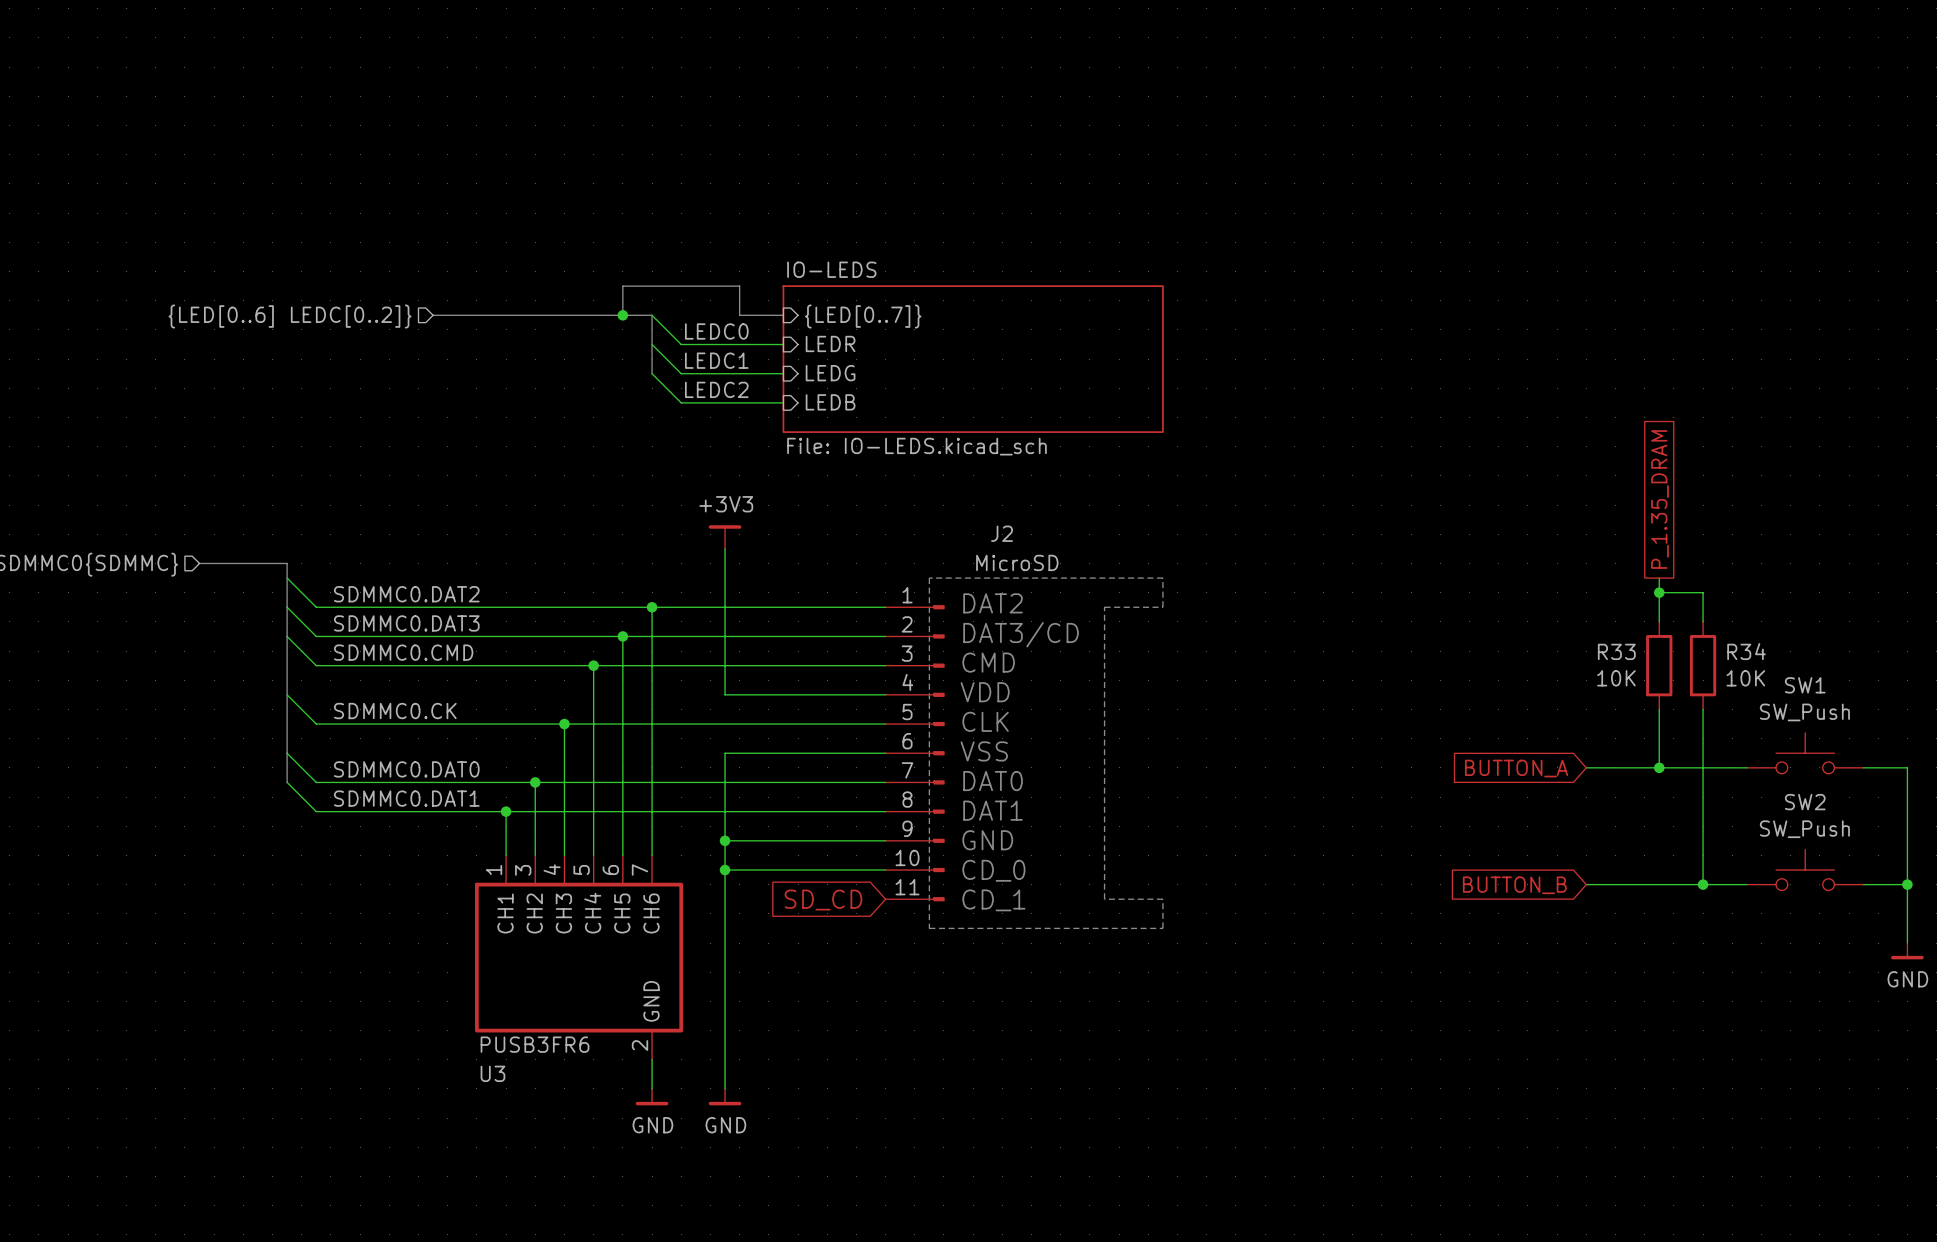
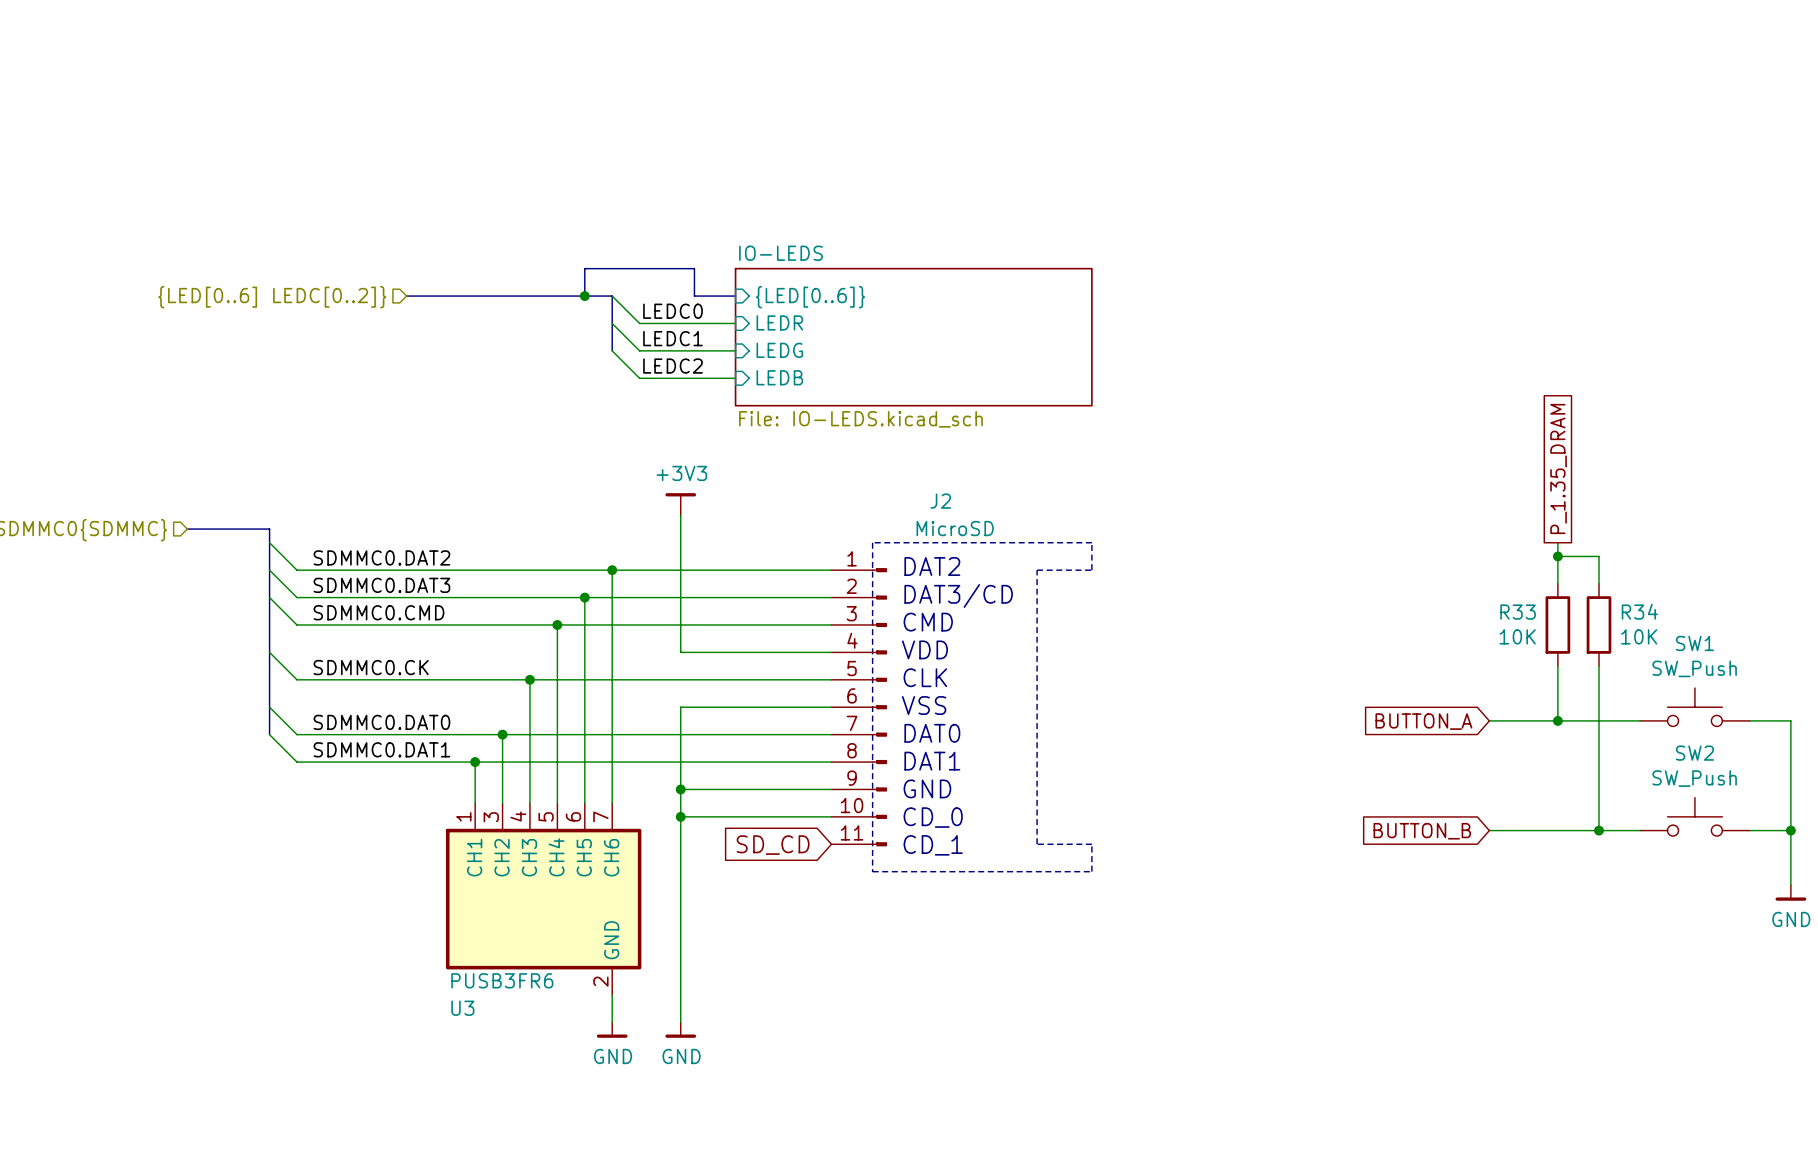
sheet pin: {LED[0..7]} (863, 316) -> {LED[0..6]} (810, 297)

